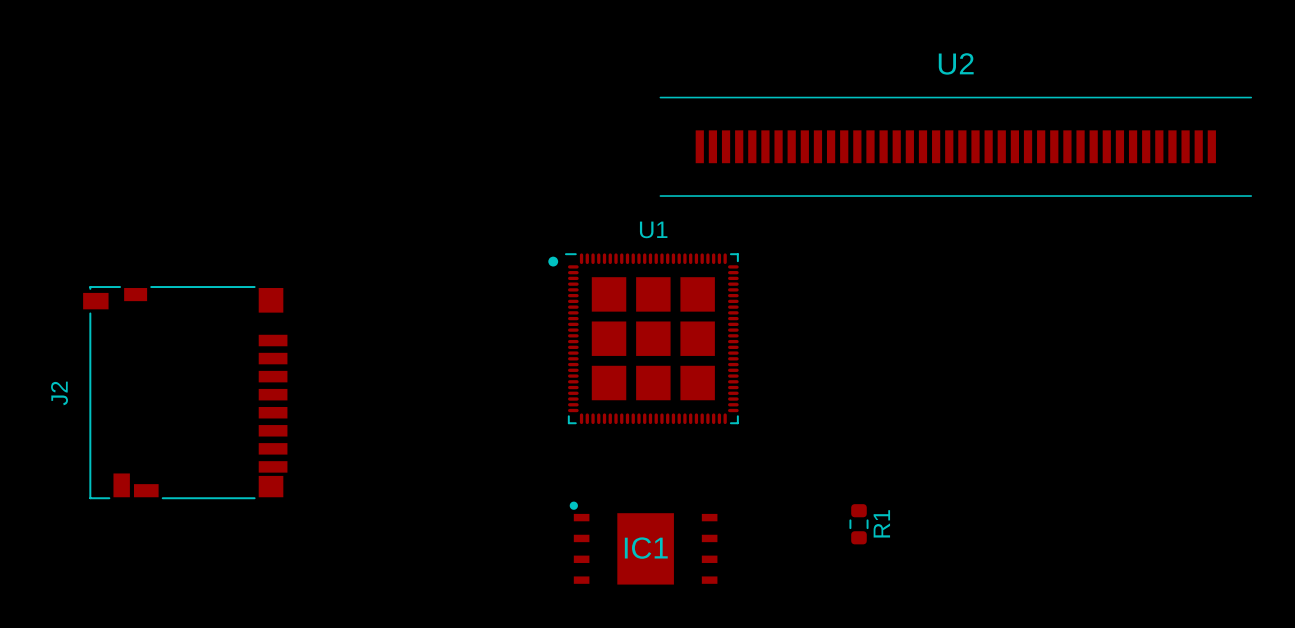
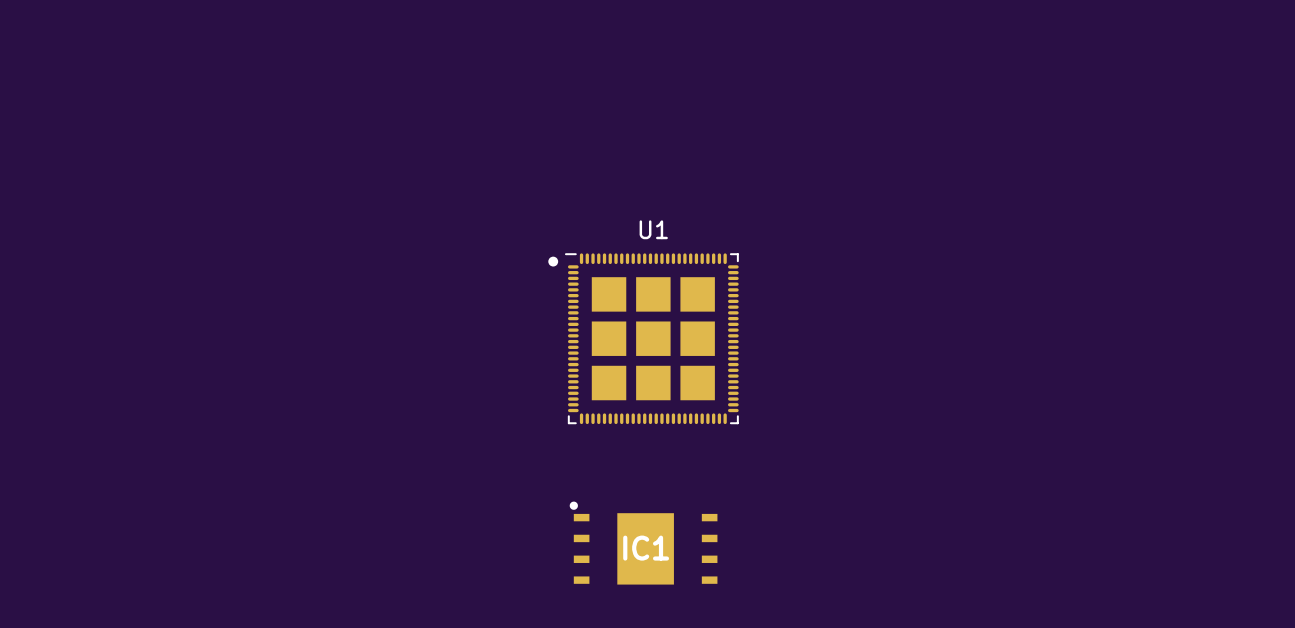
U2: (955, 146) -> none
J2: (185, 392) -> none
R1: (858, 524) -> none

